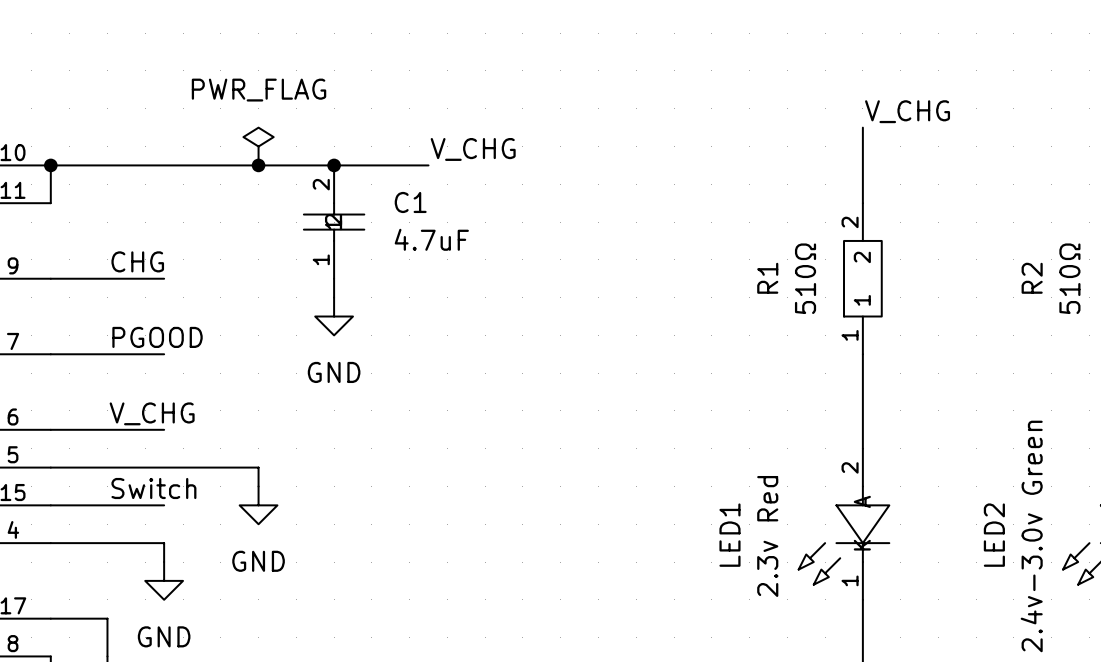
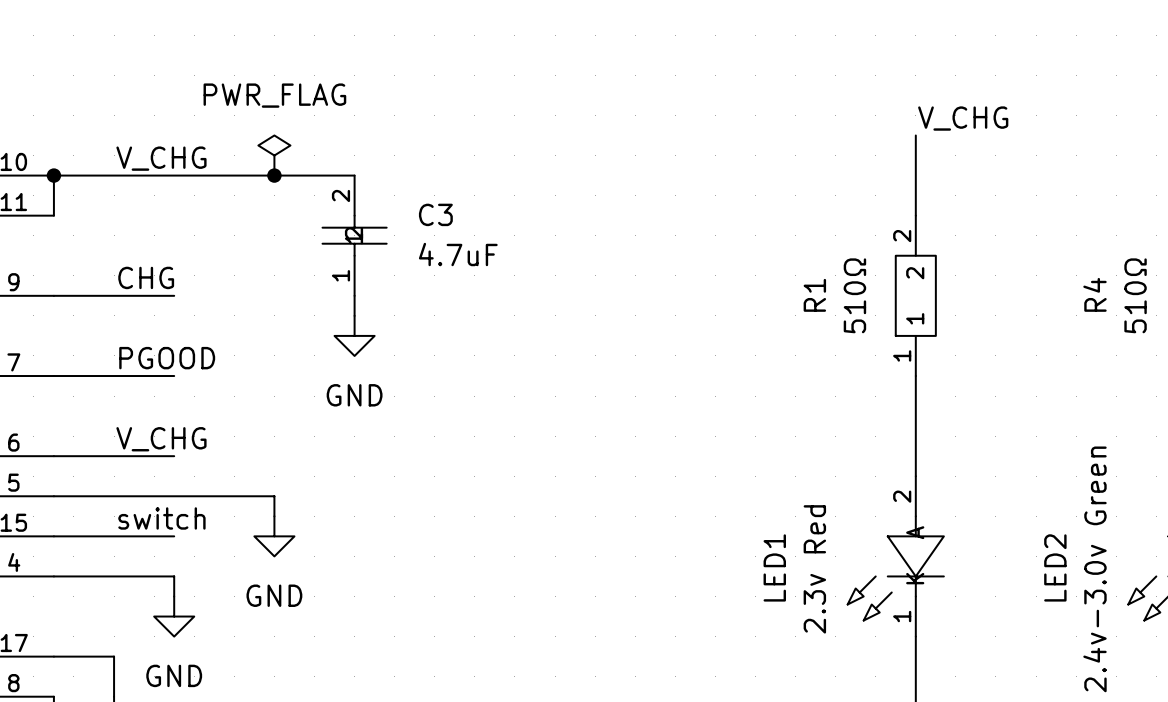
label position: V_CHG (473, 149) -> V_CHG (161, 158)
wire: (334, 165) (428, 165) -> none
junction: (334, 165) -> none
C1 name: C1 (410, 202) -> C3 (435, 214)
R2 name: R2 (1032, 278) -> R4 (1094, 294)
label: Switch (153, 488) -> switch (161, 518)

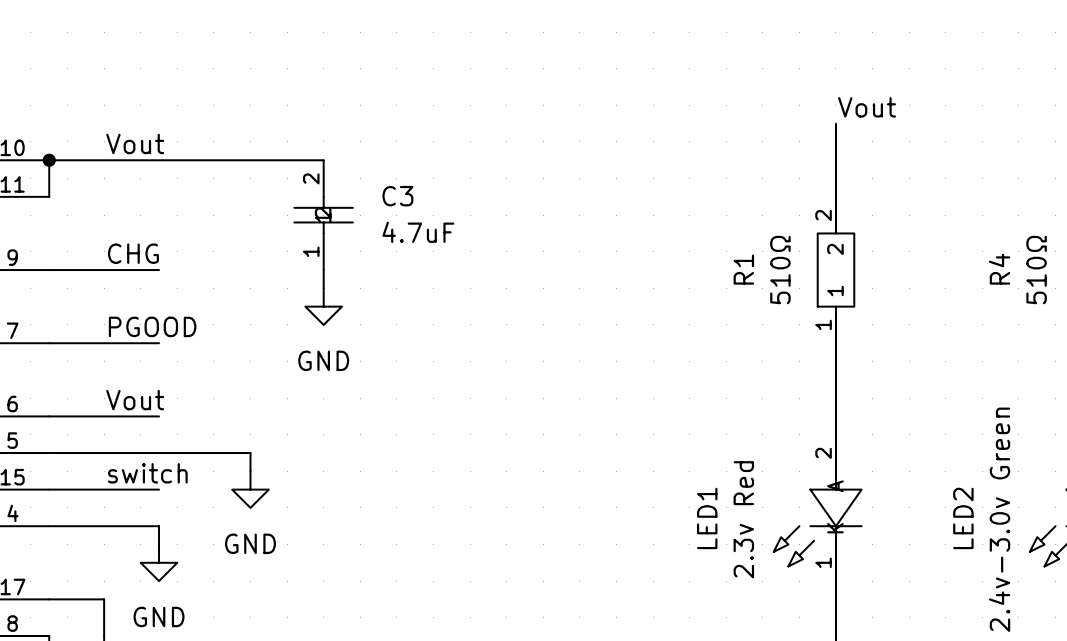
label: V_CHG (963, 118) -> Vout (867, 107)
power symbol: PWR_FLAG (274, 155) -> none
label: V_CHG (161, 158) -> Vout (135, 143)
junction: (274, 175) -> none
label: V_CHG (161, 439) -> Vout (135, 400)

